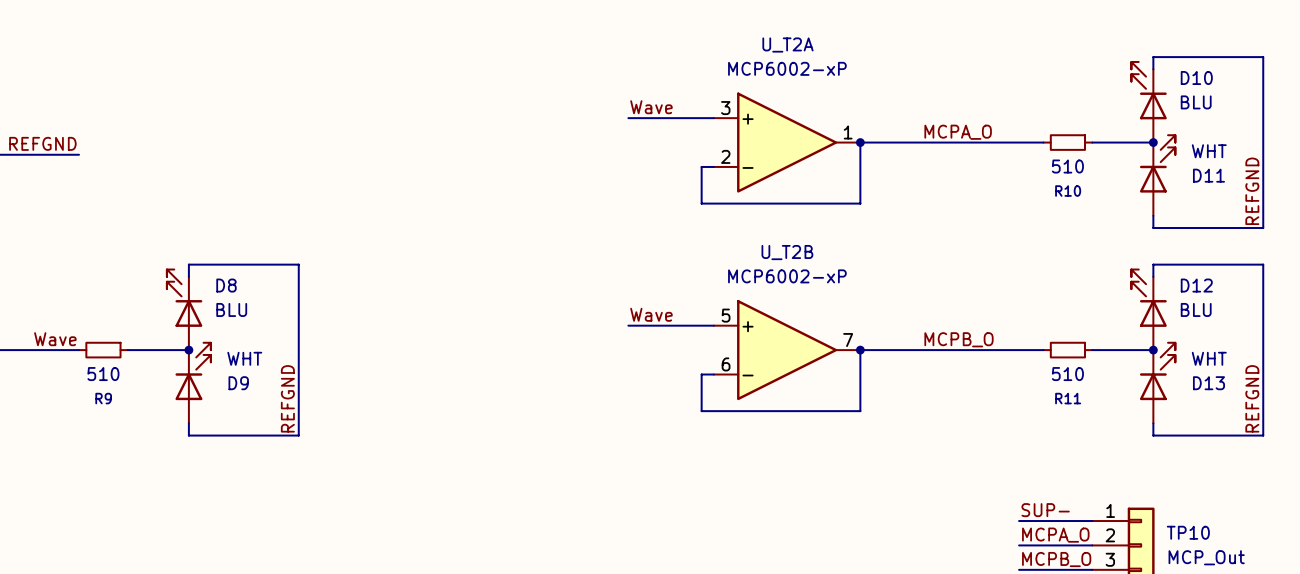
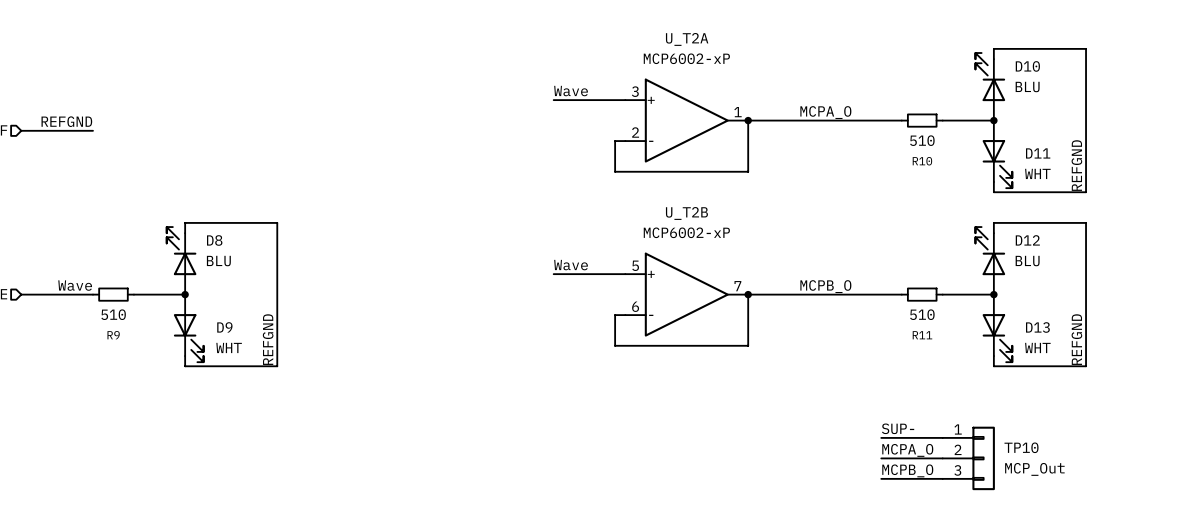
D11 flip: as is (1157, 163) -> up-down (997, 164)
D9 flip: as is (193, 371) -> up-down (188, 338)
D13 flip: as is (1157, 371) -> up-down (997, 338)

